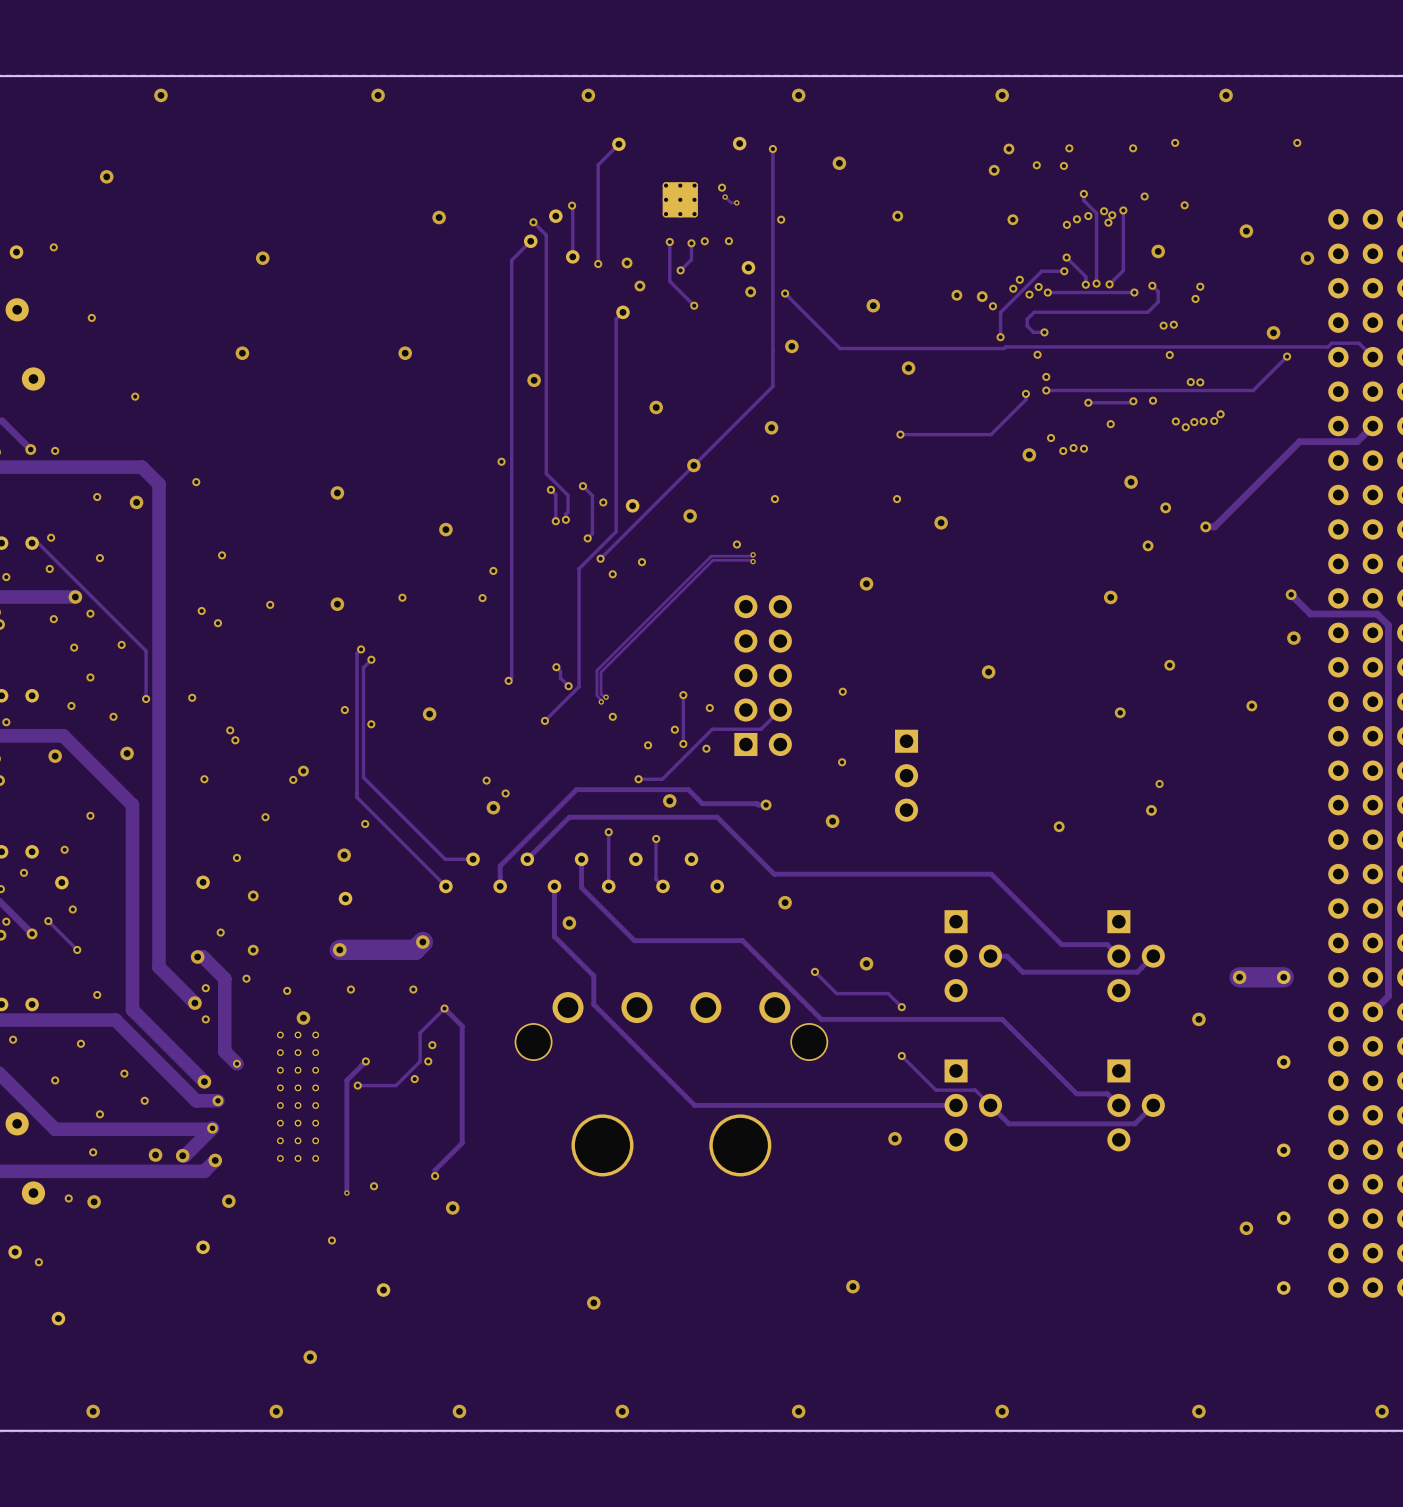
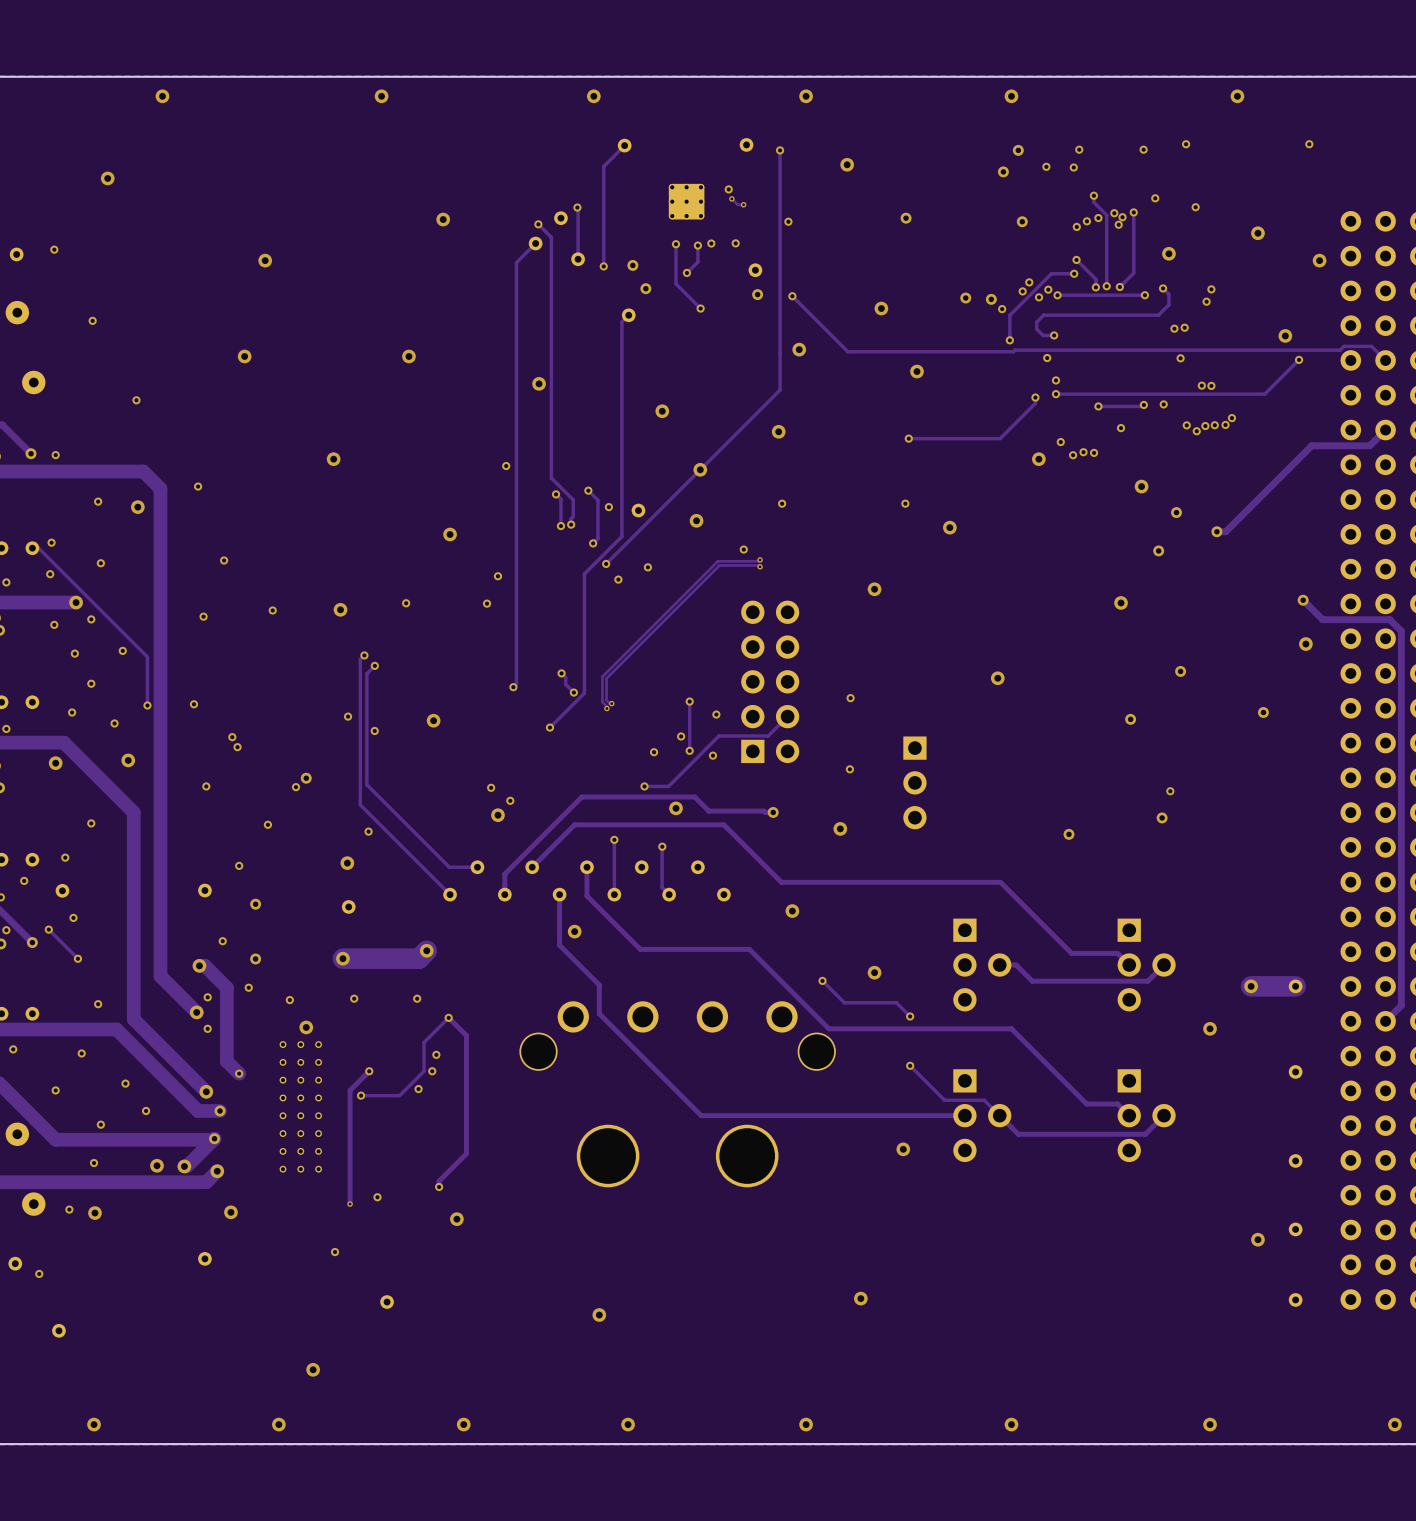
via position: (337, 492) -> (333, 459)
via: (217, 623) -> none
via: (612, 716) -> none

